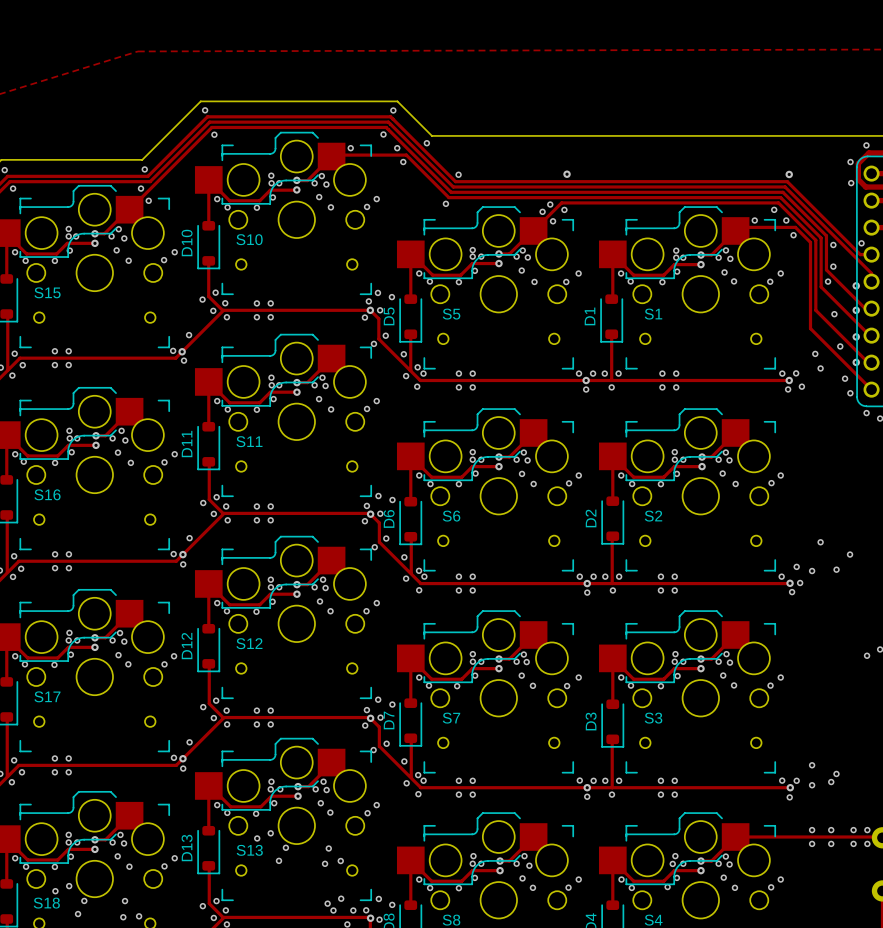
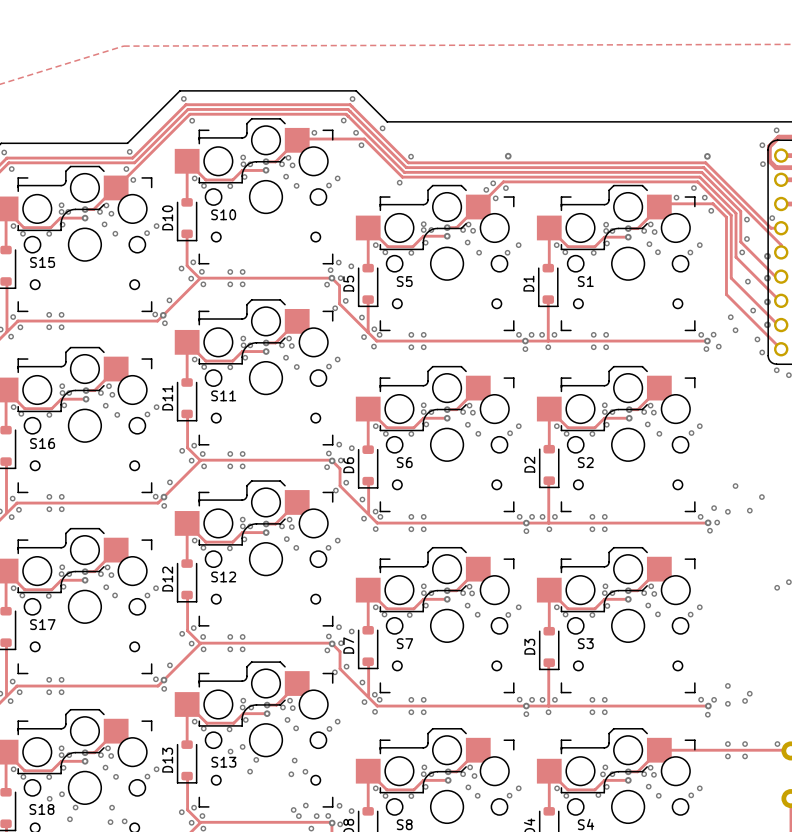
via: (853, 830) -> none
via: (853, 843) -> none
via: (867, 843) -> none

